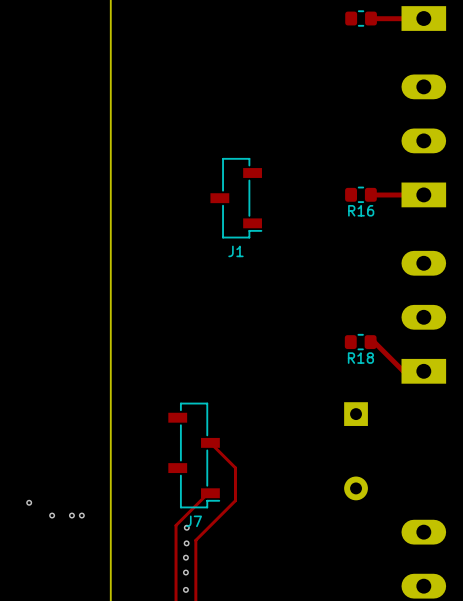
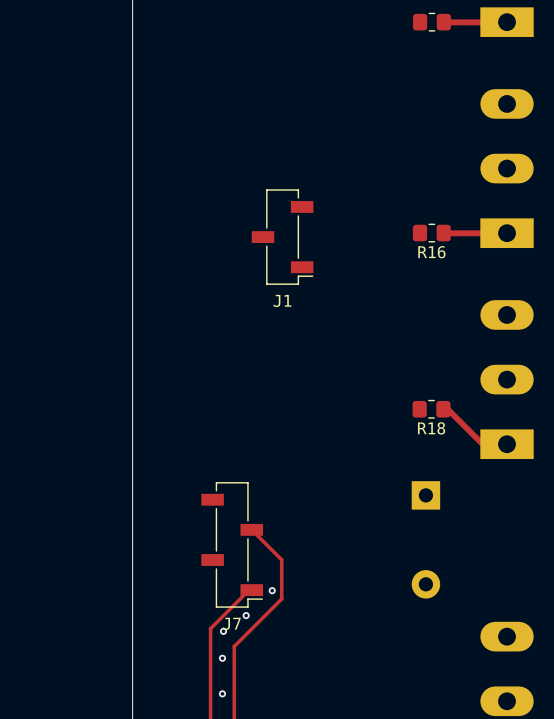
via: none -> (272, 590)
via: (29, 502) -> none
via: none -> (246, 615)
via: (52, 515) -> none
via: (71, 515) -> none
via: (81, 515) -> none
via: (186, 543) -> none
via: none -> (222, 658)
via: (185, 557) -> none
via: (185, 572) -> none
via: none -> (222, 693)
via: (185, 589) -> none

